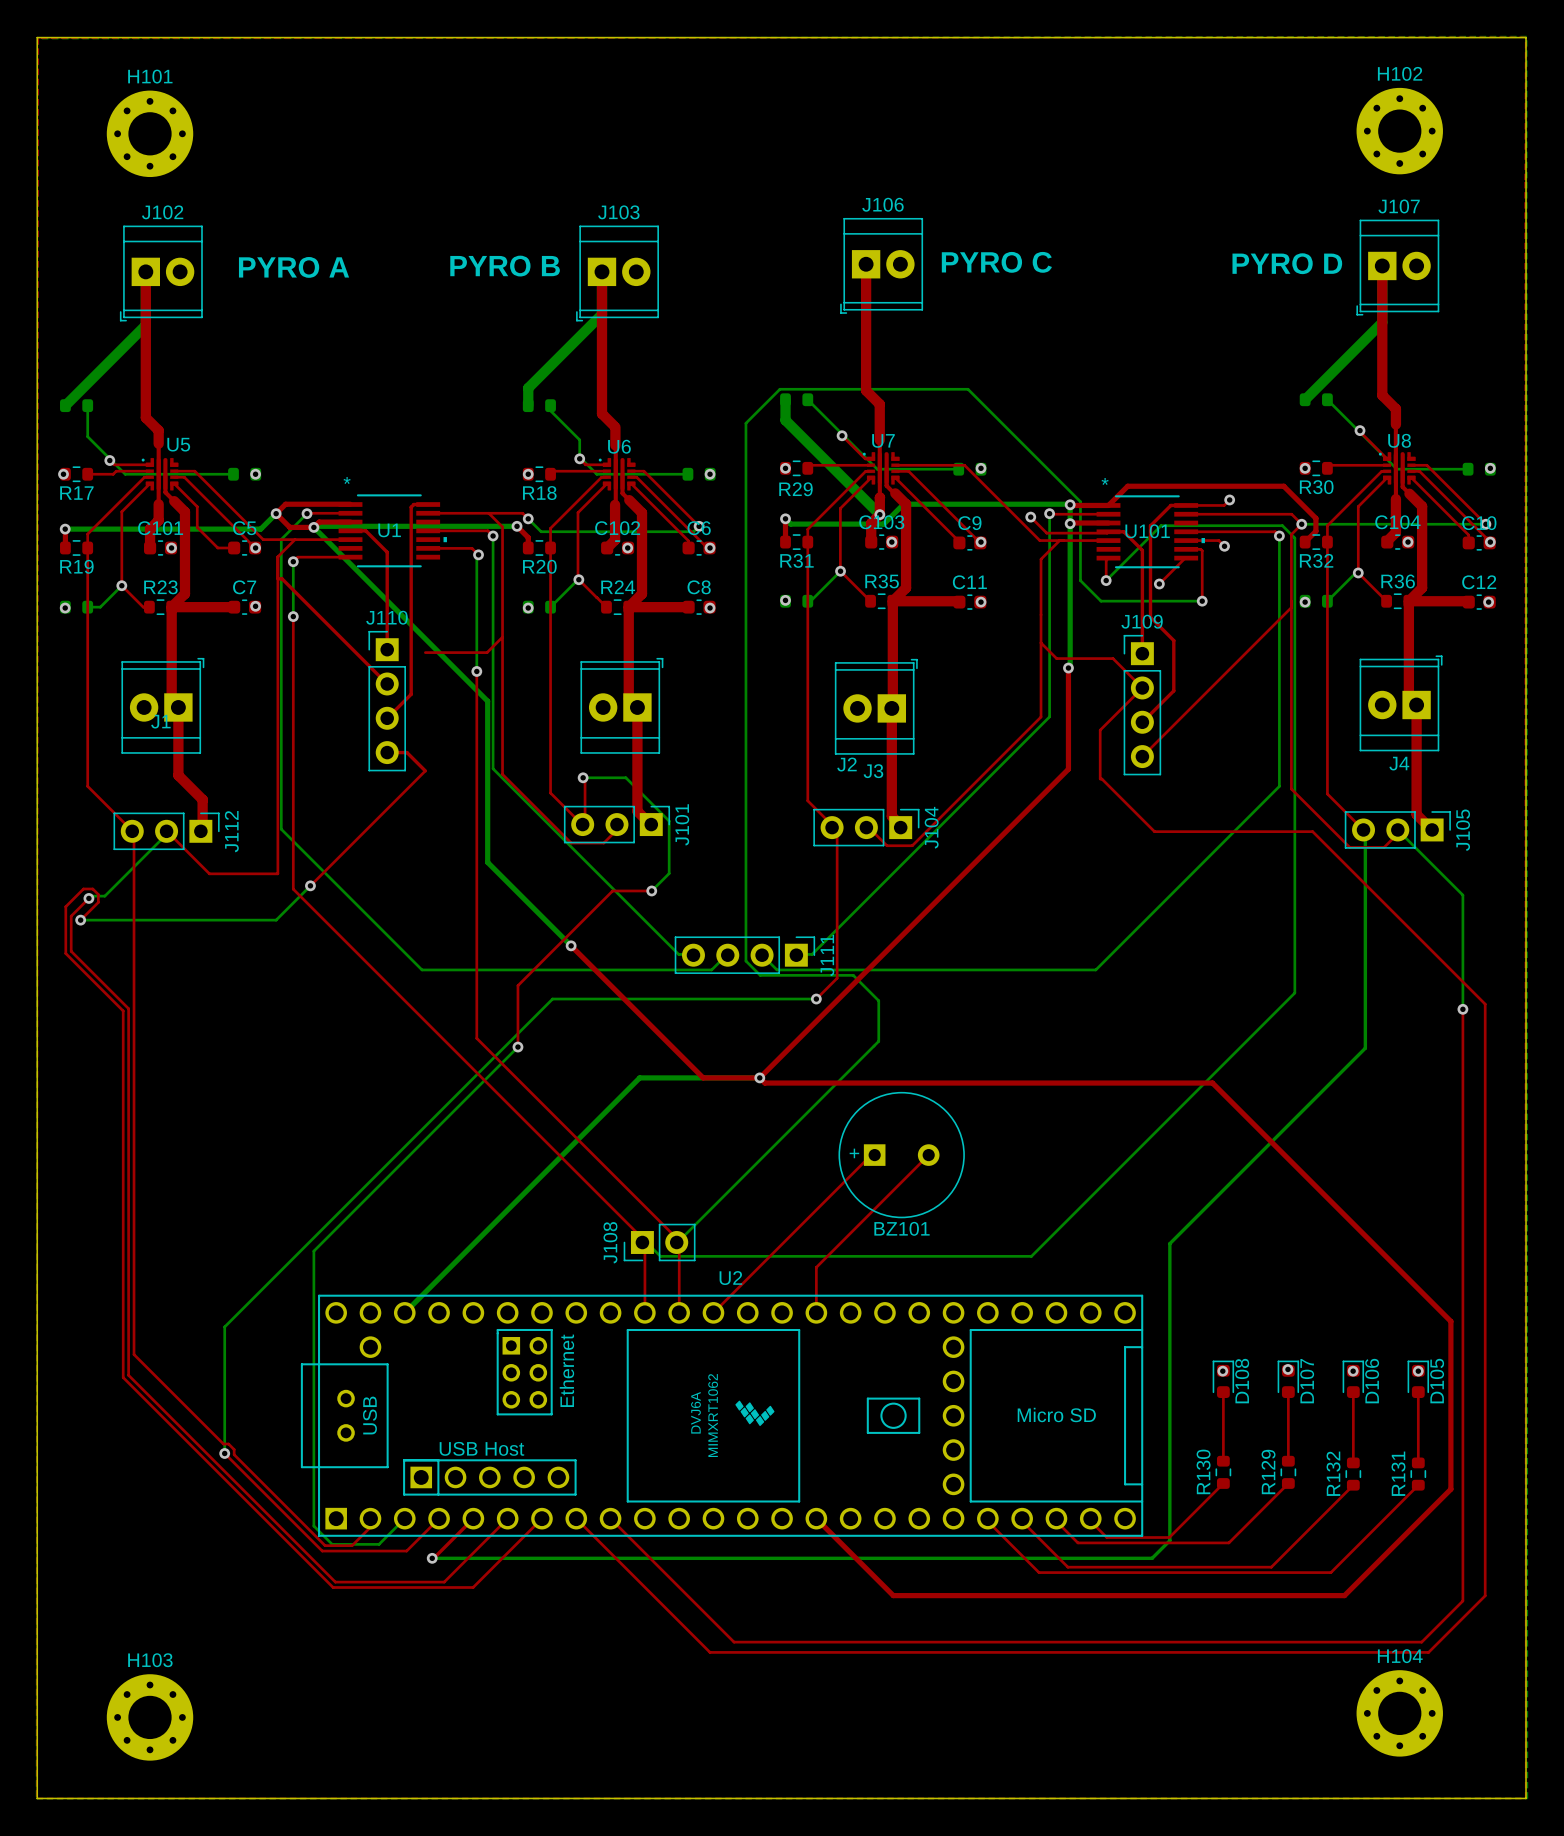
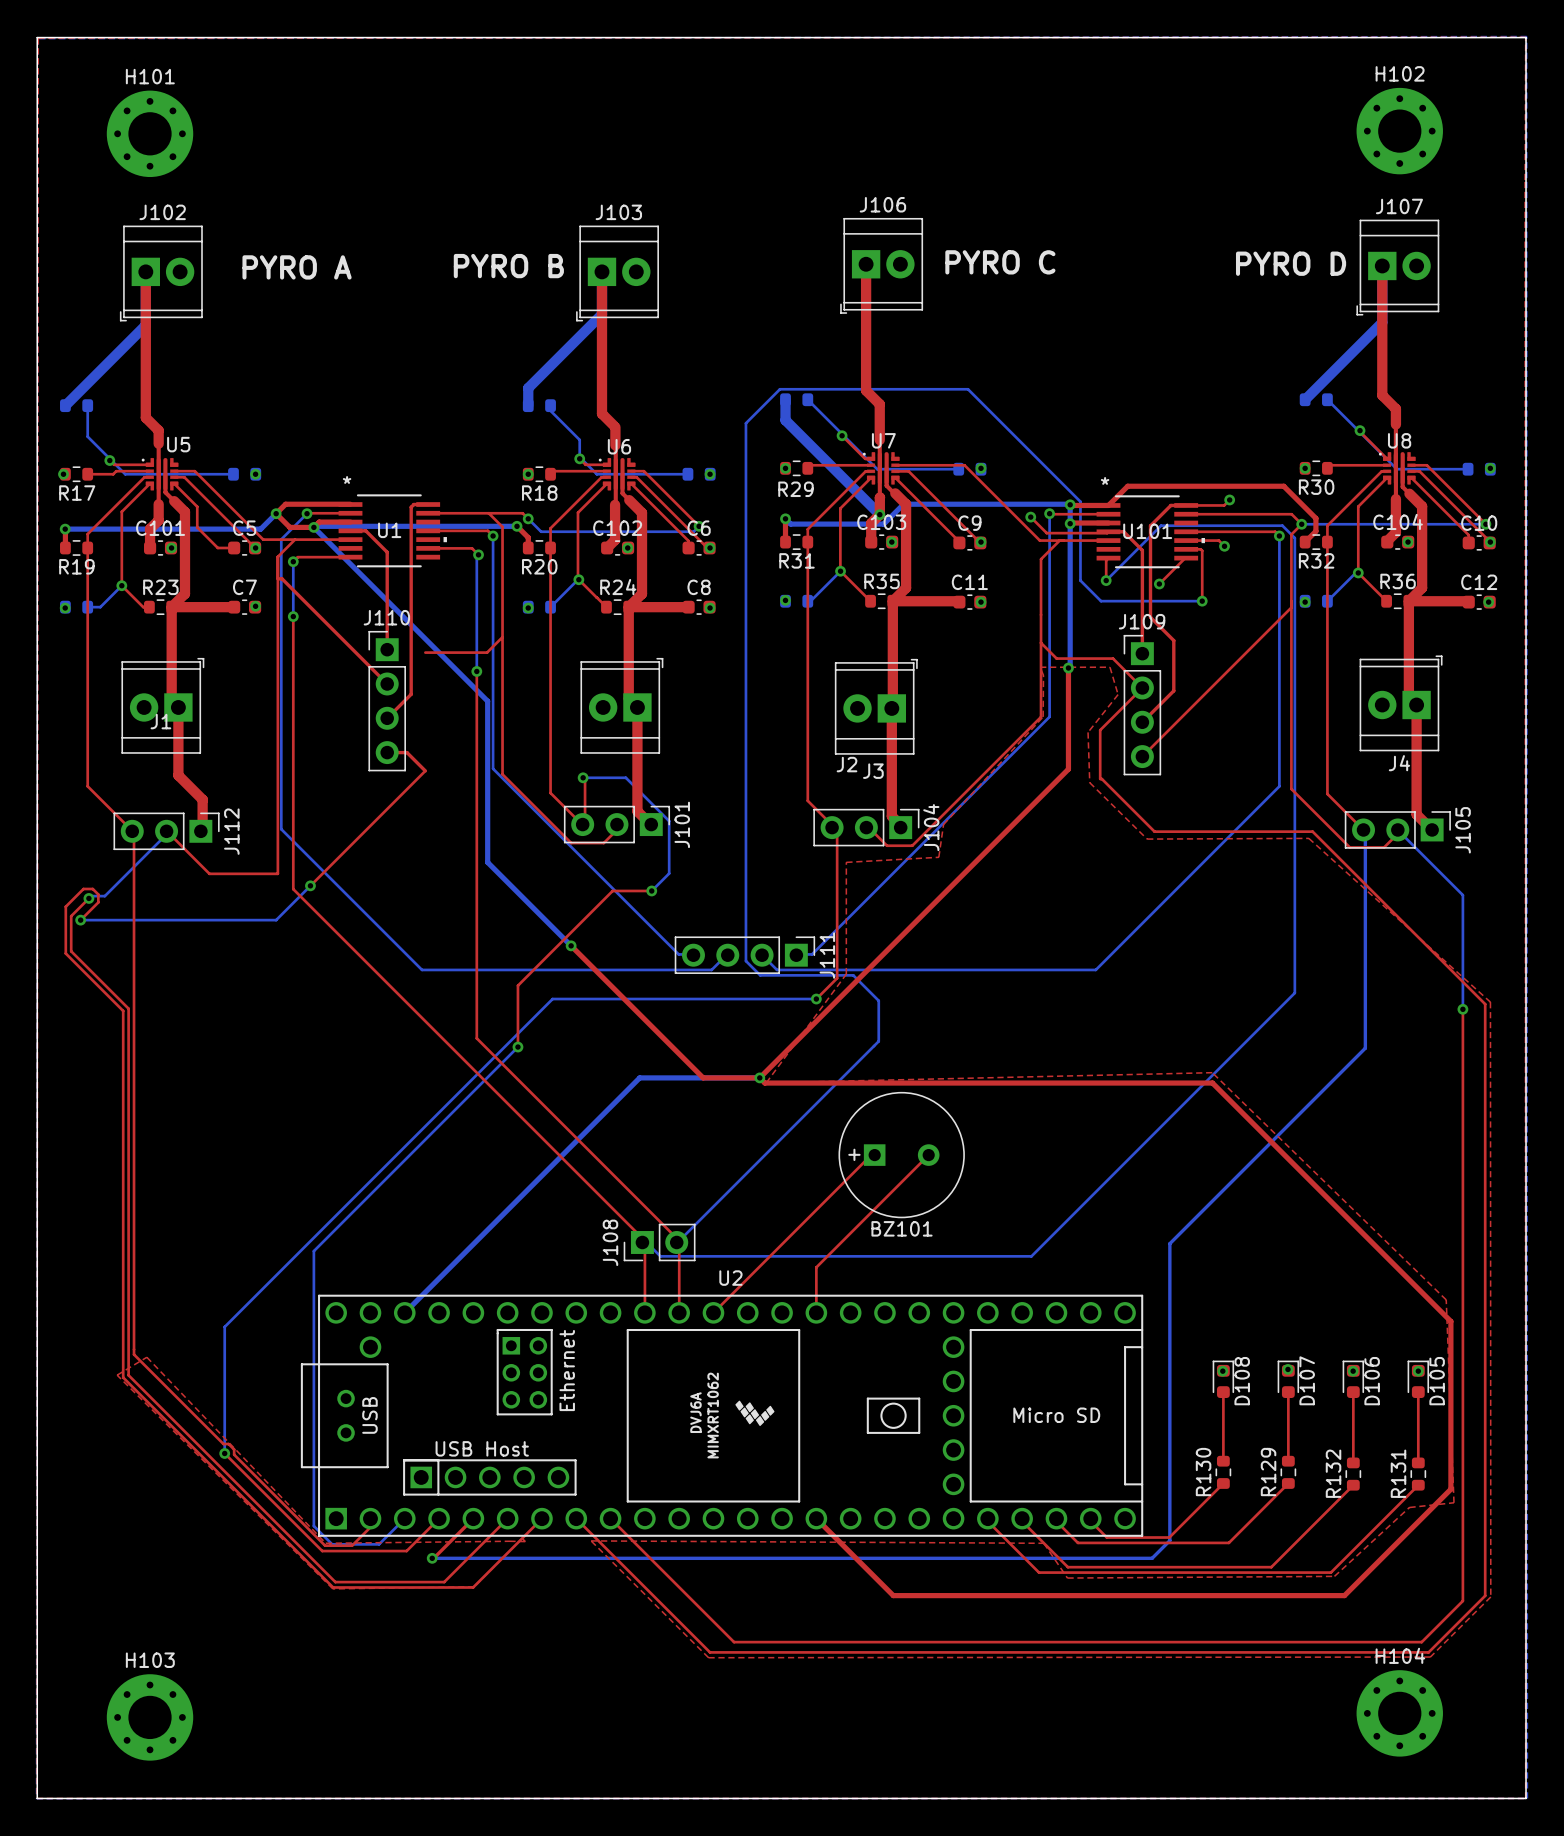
top zone outline: none -> (1040, 667) (1109, 667) (1118, 694) (1088, 732) (1089, 782) (1147, 839) (1308, 838) (1490, 1002) (1490, 1596) (1430, 1657) (708, 1657) (591, 1540) (1043, 1543) (1067, 1578) (1334, 1576) (1409, 1507) (1454, 1502) (1446, 1299) (1212, 1072) (766, 1082) (846, 974) (846, 862) (938, 857) (943, 824) (1043, 716) (1043, 675) (1040, 667)
top zone outline: none -> (146, 1357) (117, 1375) (332, 1588) (474, 1586) (522, 1538) (525, 1541) (509, 1541) (325, 1543) (146, 1357)

